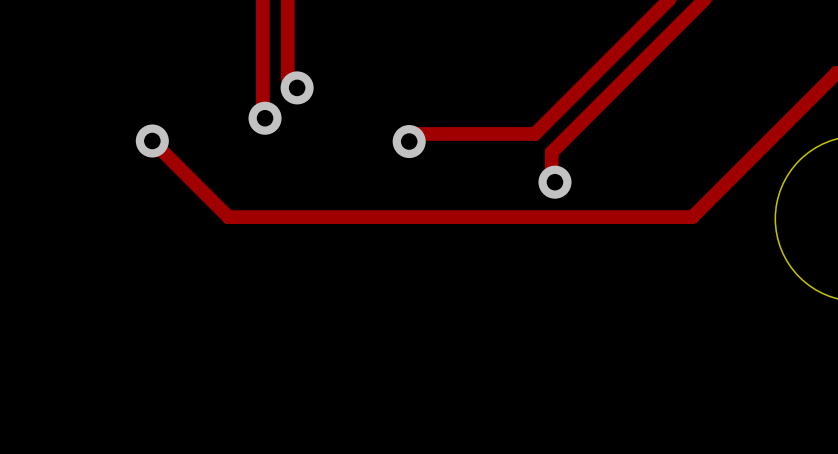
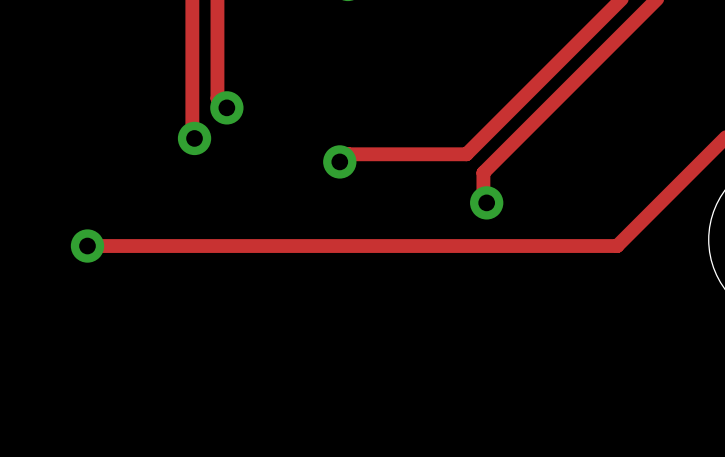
track: (152, 141) (228, 217) (692, 217) -> (87, 246) (617, 246) (625, 238)
via position: (152, 141) -> (87, 246)

